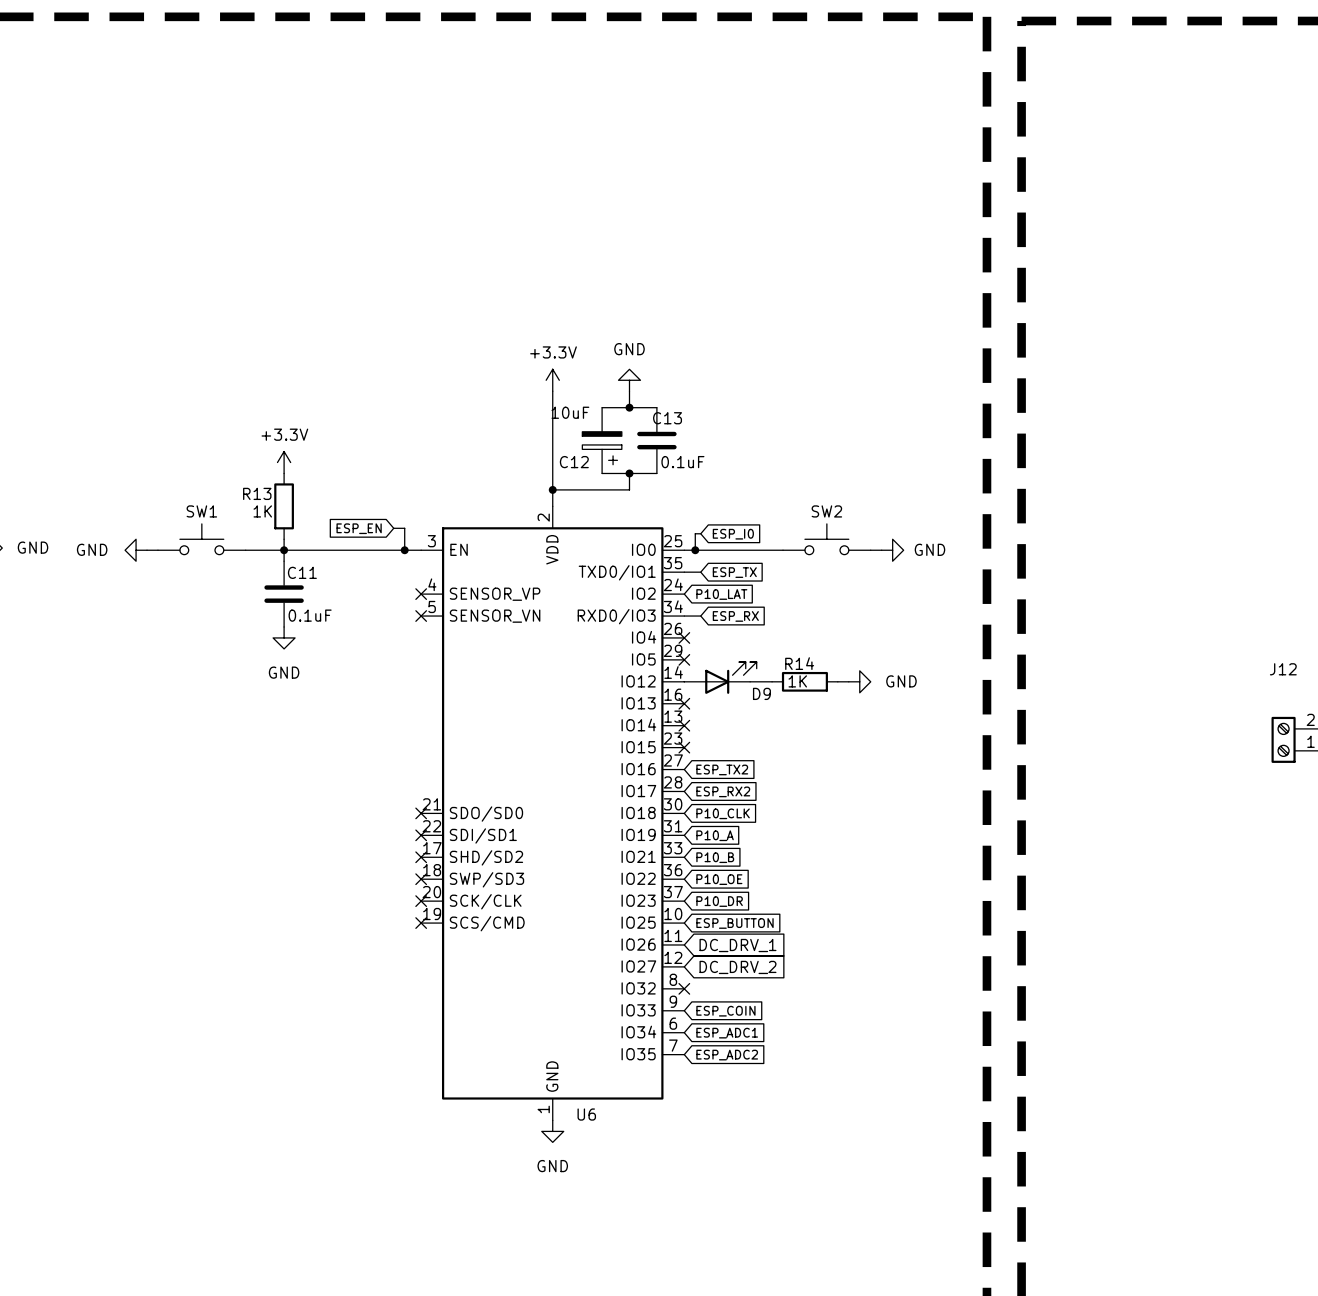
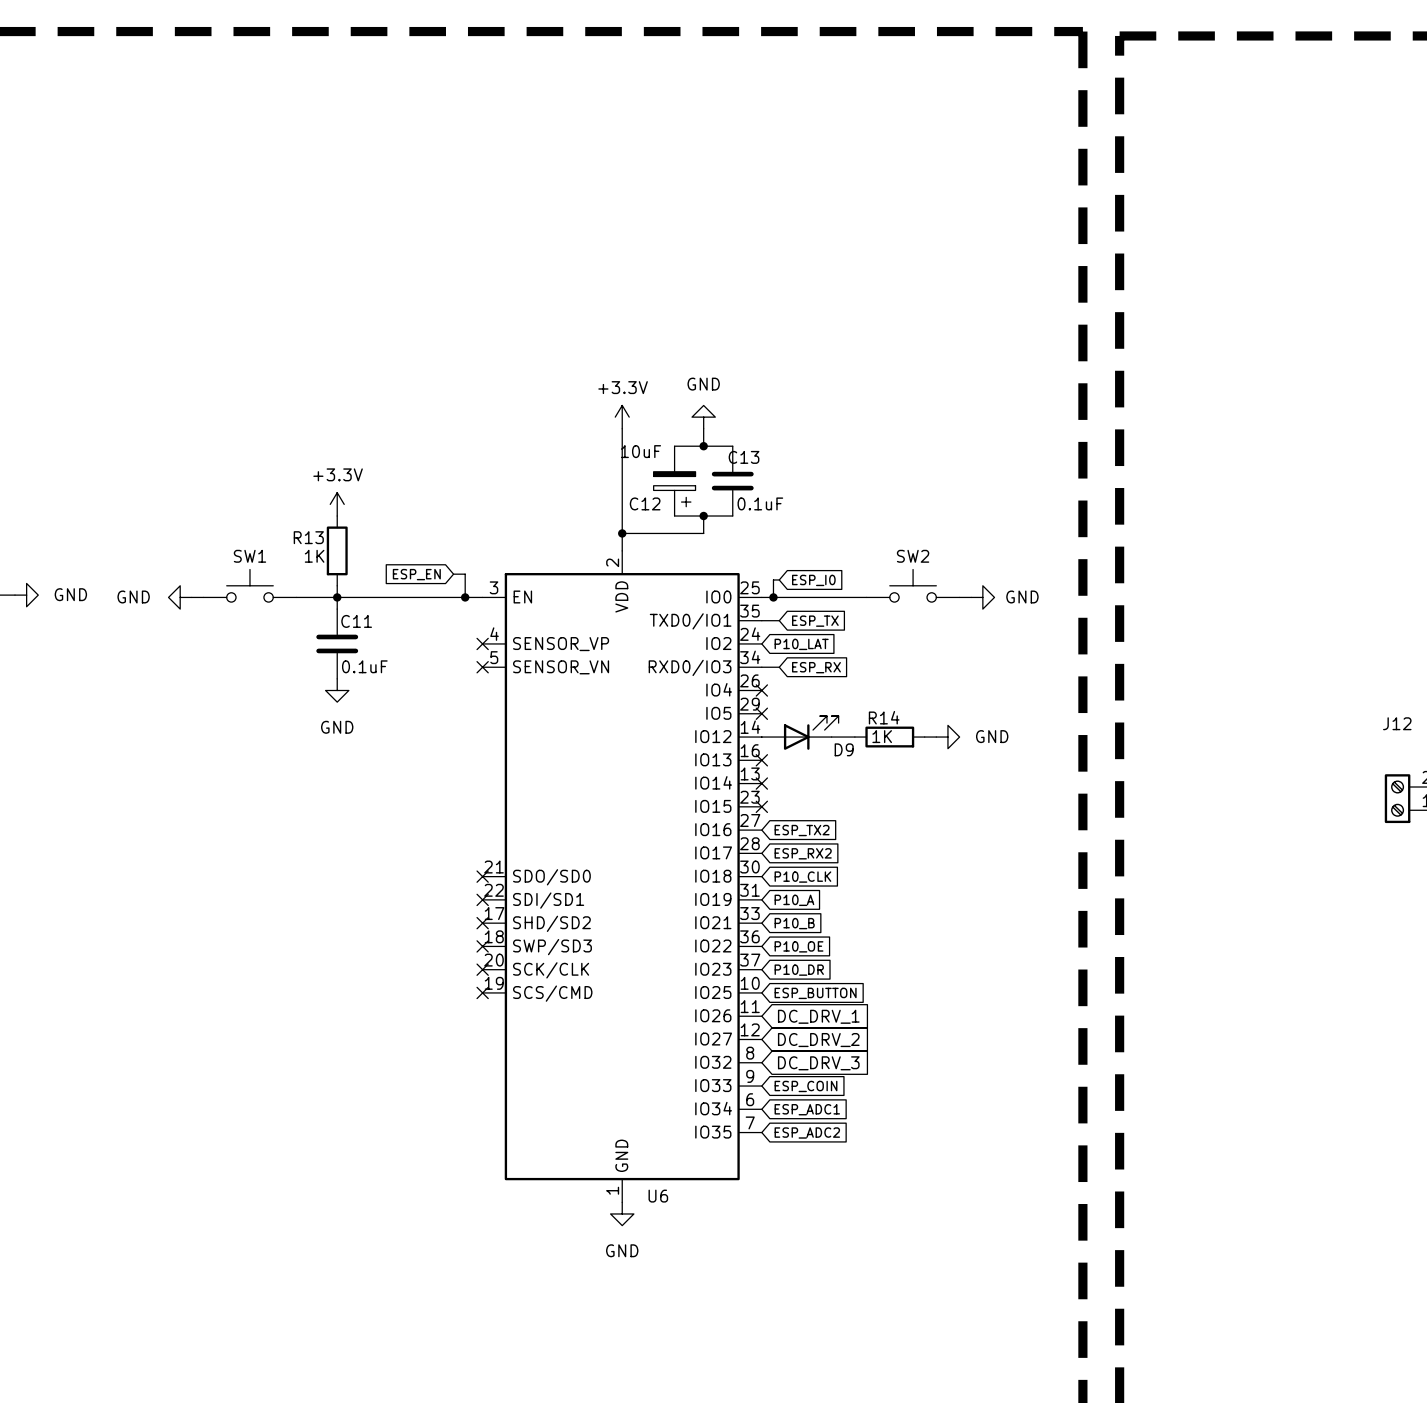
no-connect mark: (684, 988) -> none
global label: none -> DC_DRV_3 (818, 1063)

